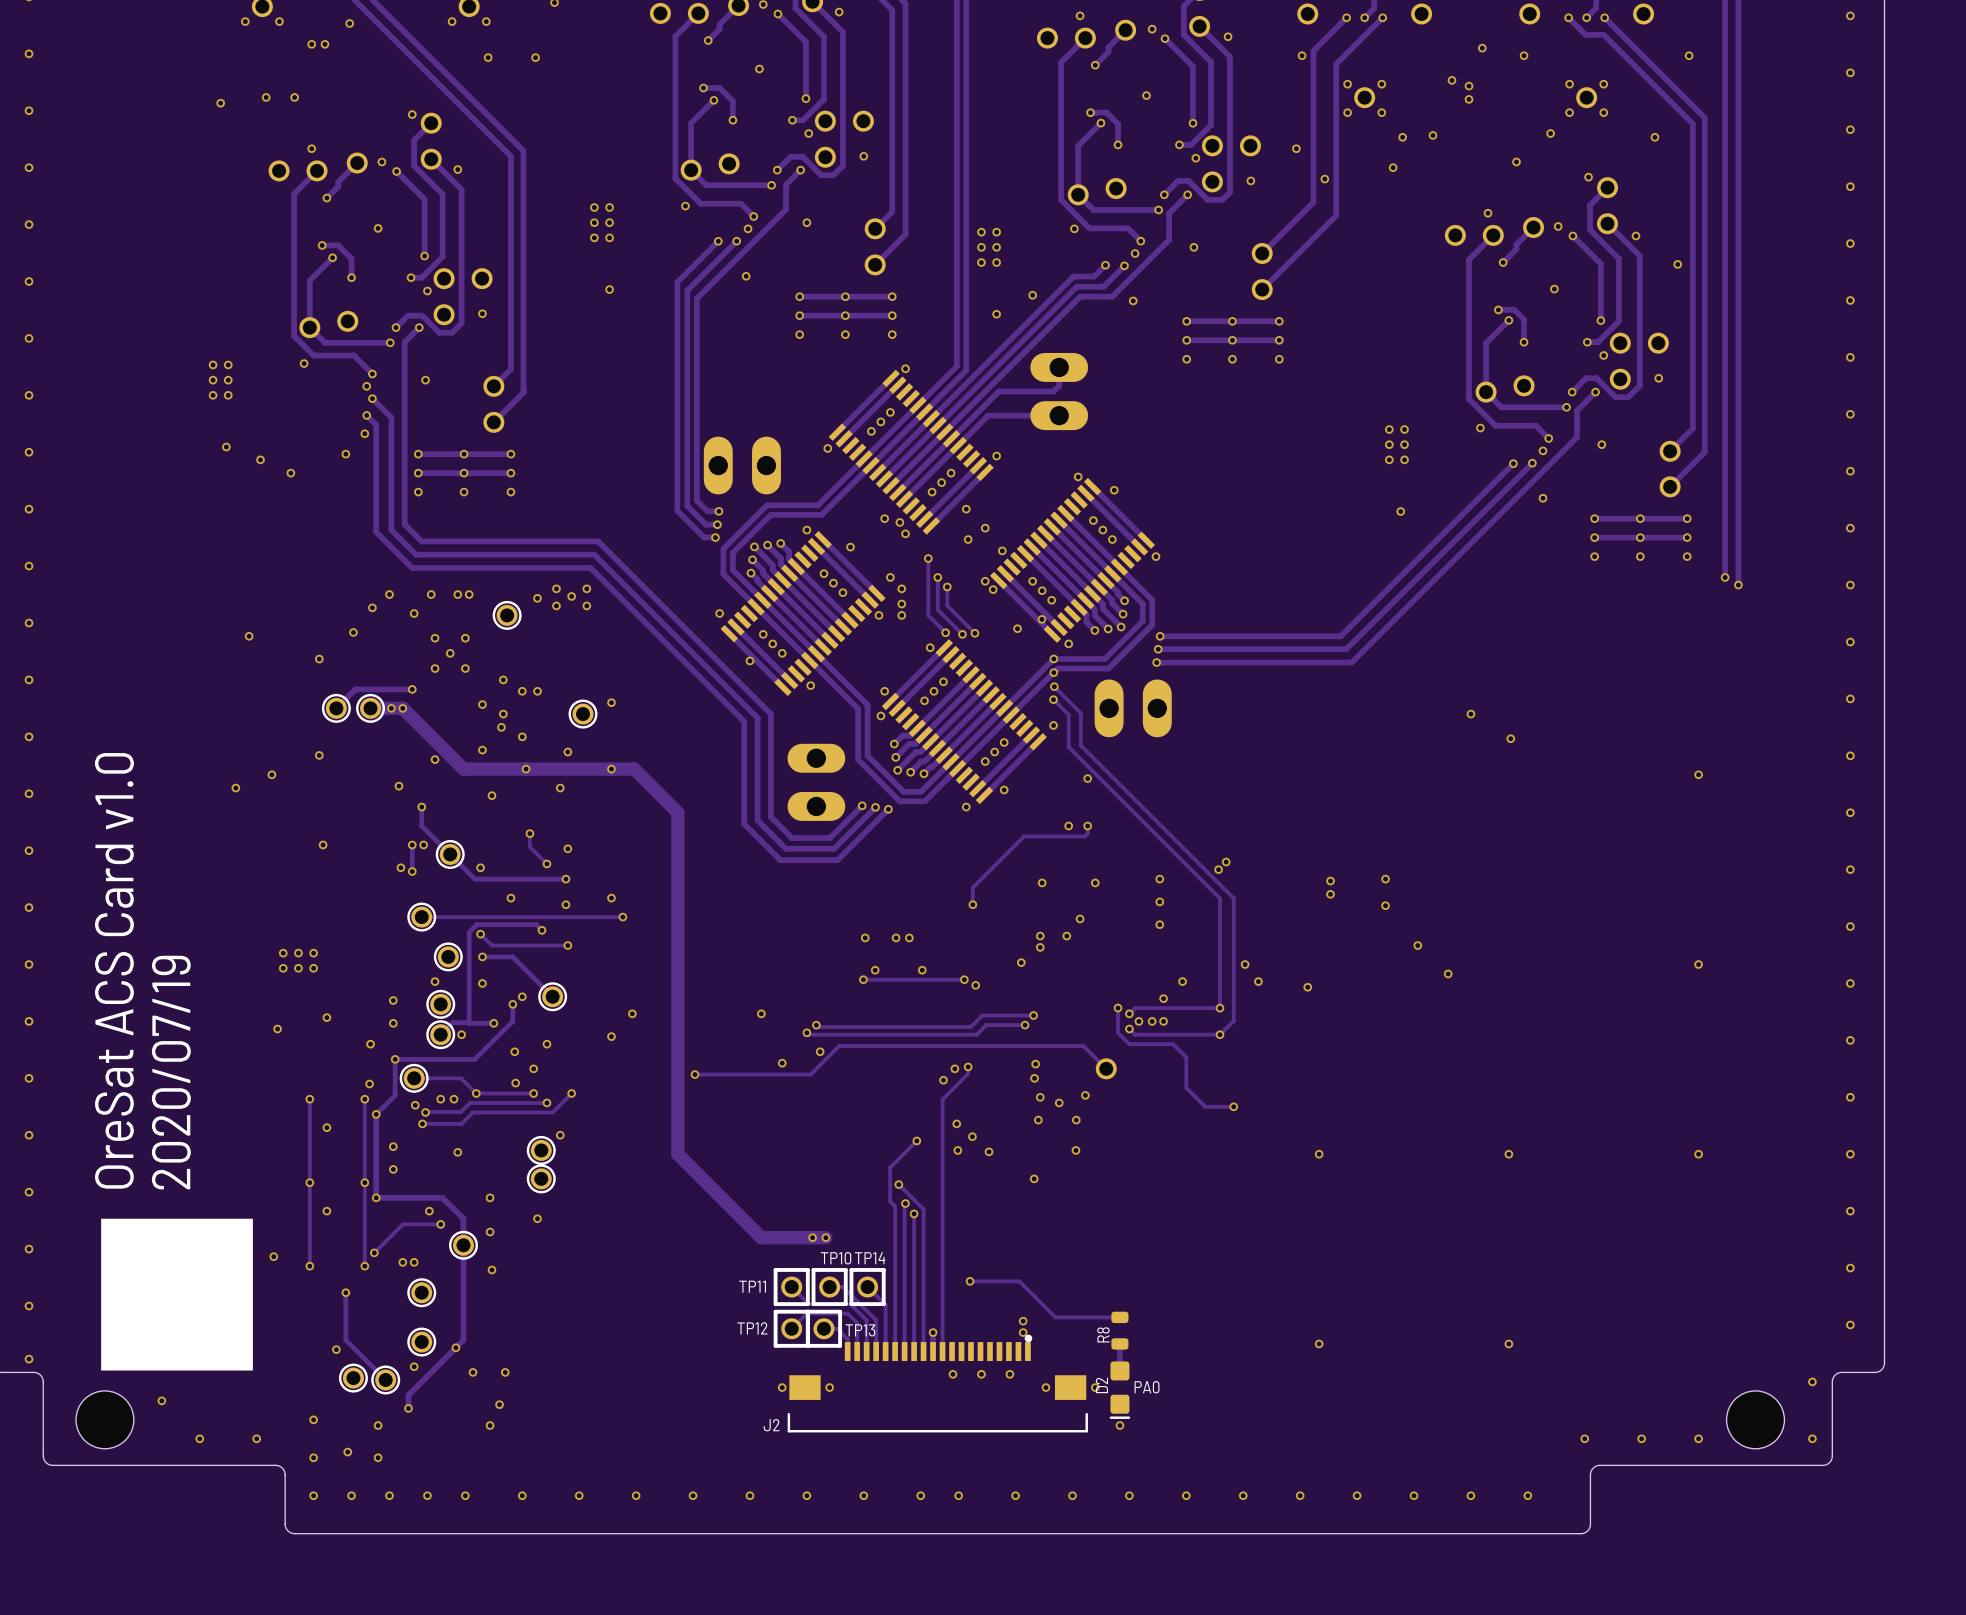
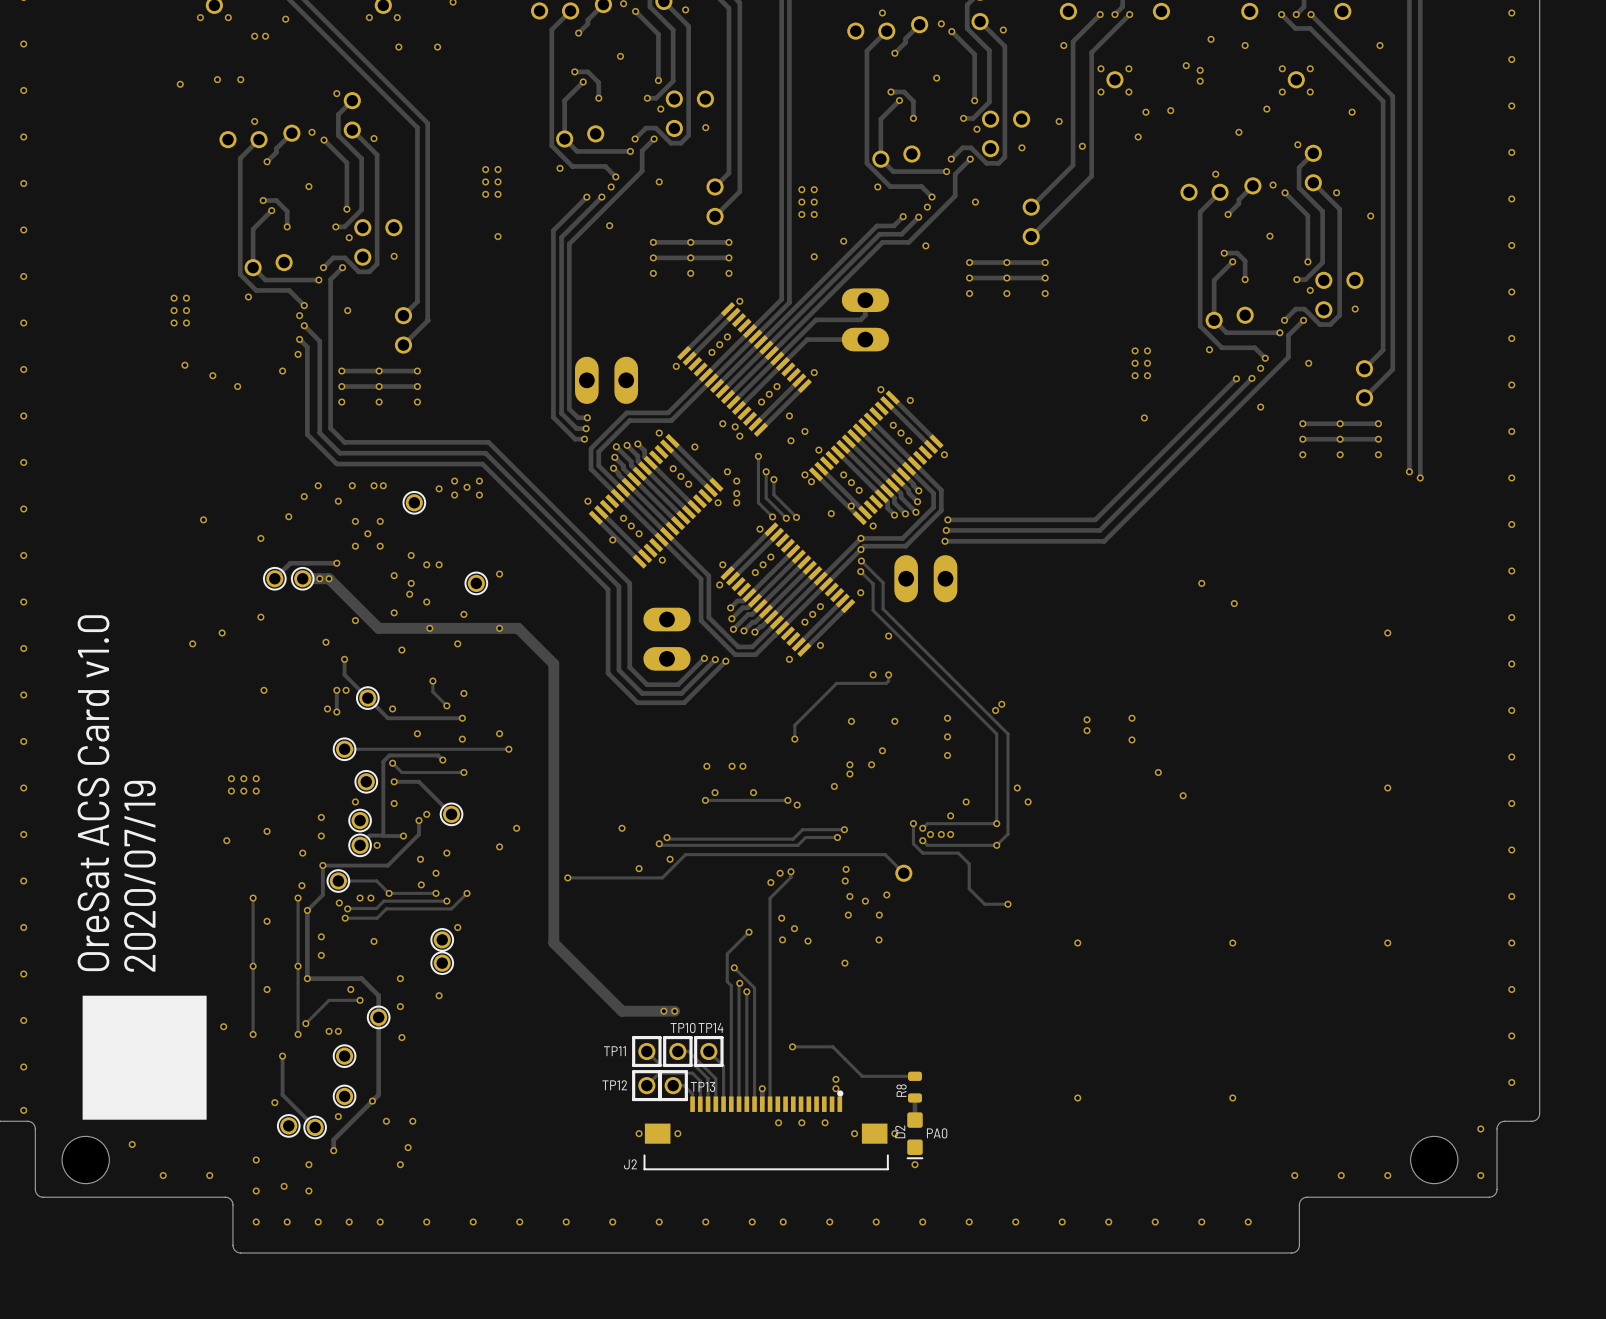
via: (1307, 987) -> none

